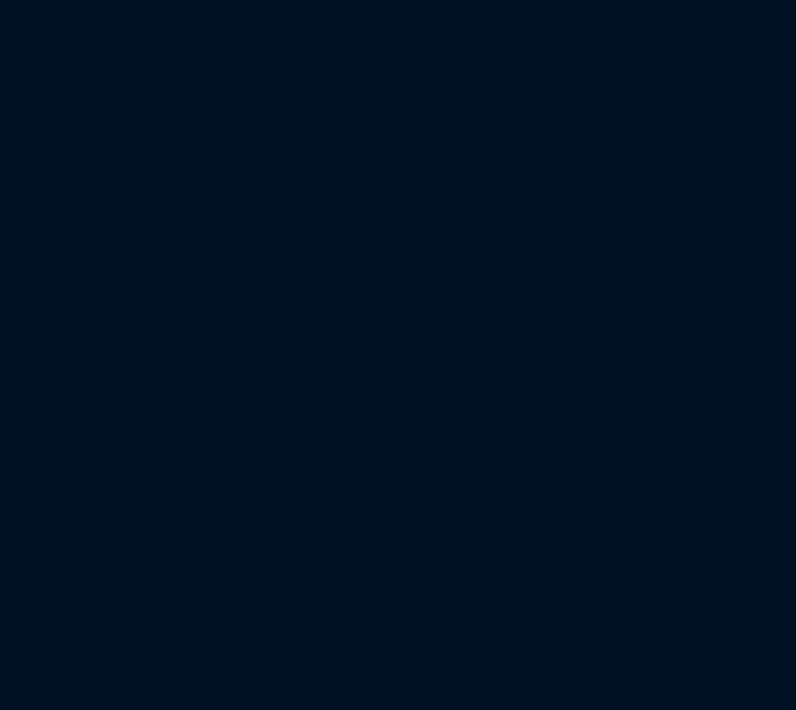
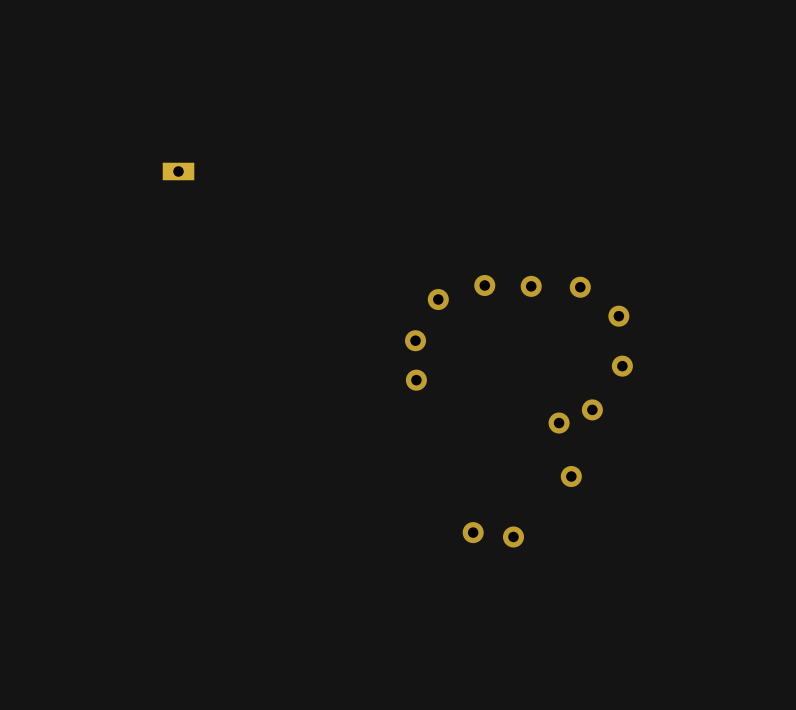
part: none -> (178, 171)
via: none -> (484, 285)
via: none -> (531, 286)
via: none -> (580, 287)
via: none -> (438, 299)
via: none -> (618, 316)
via: none -> (415, 340)
via: none -> (622, 366)
via: none -> (416, 380)
via: none -> (592, 409)
via: none -> (559, 423)
via: none -> (571, 476)
via: none -> (473, 532)
via: none -> (513, 536)

